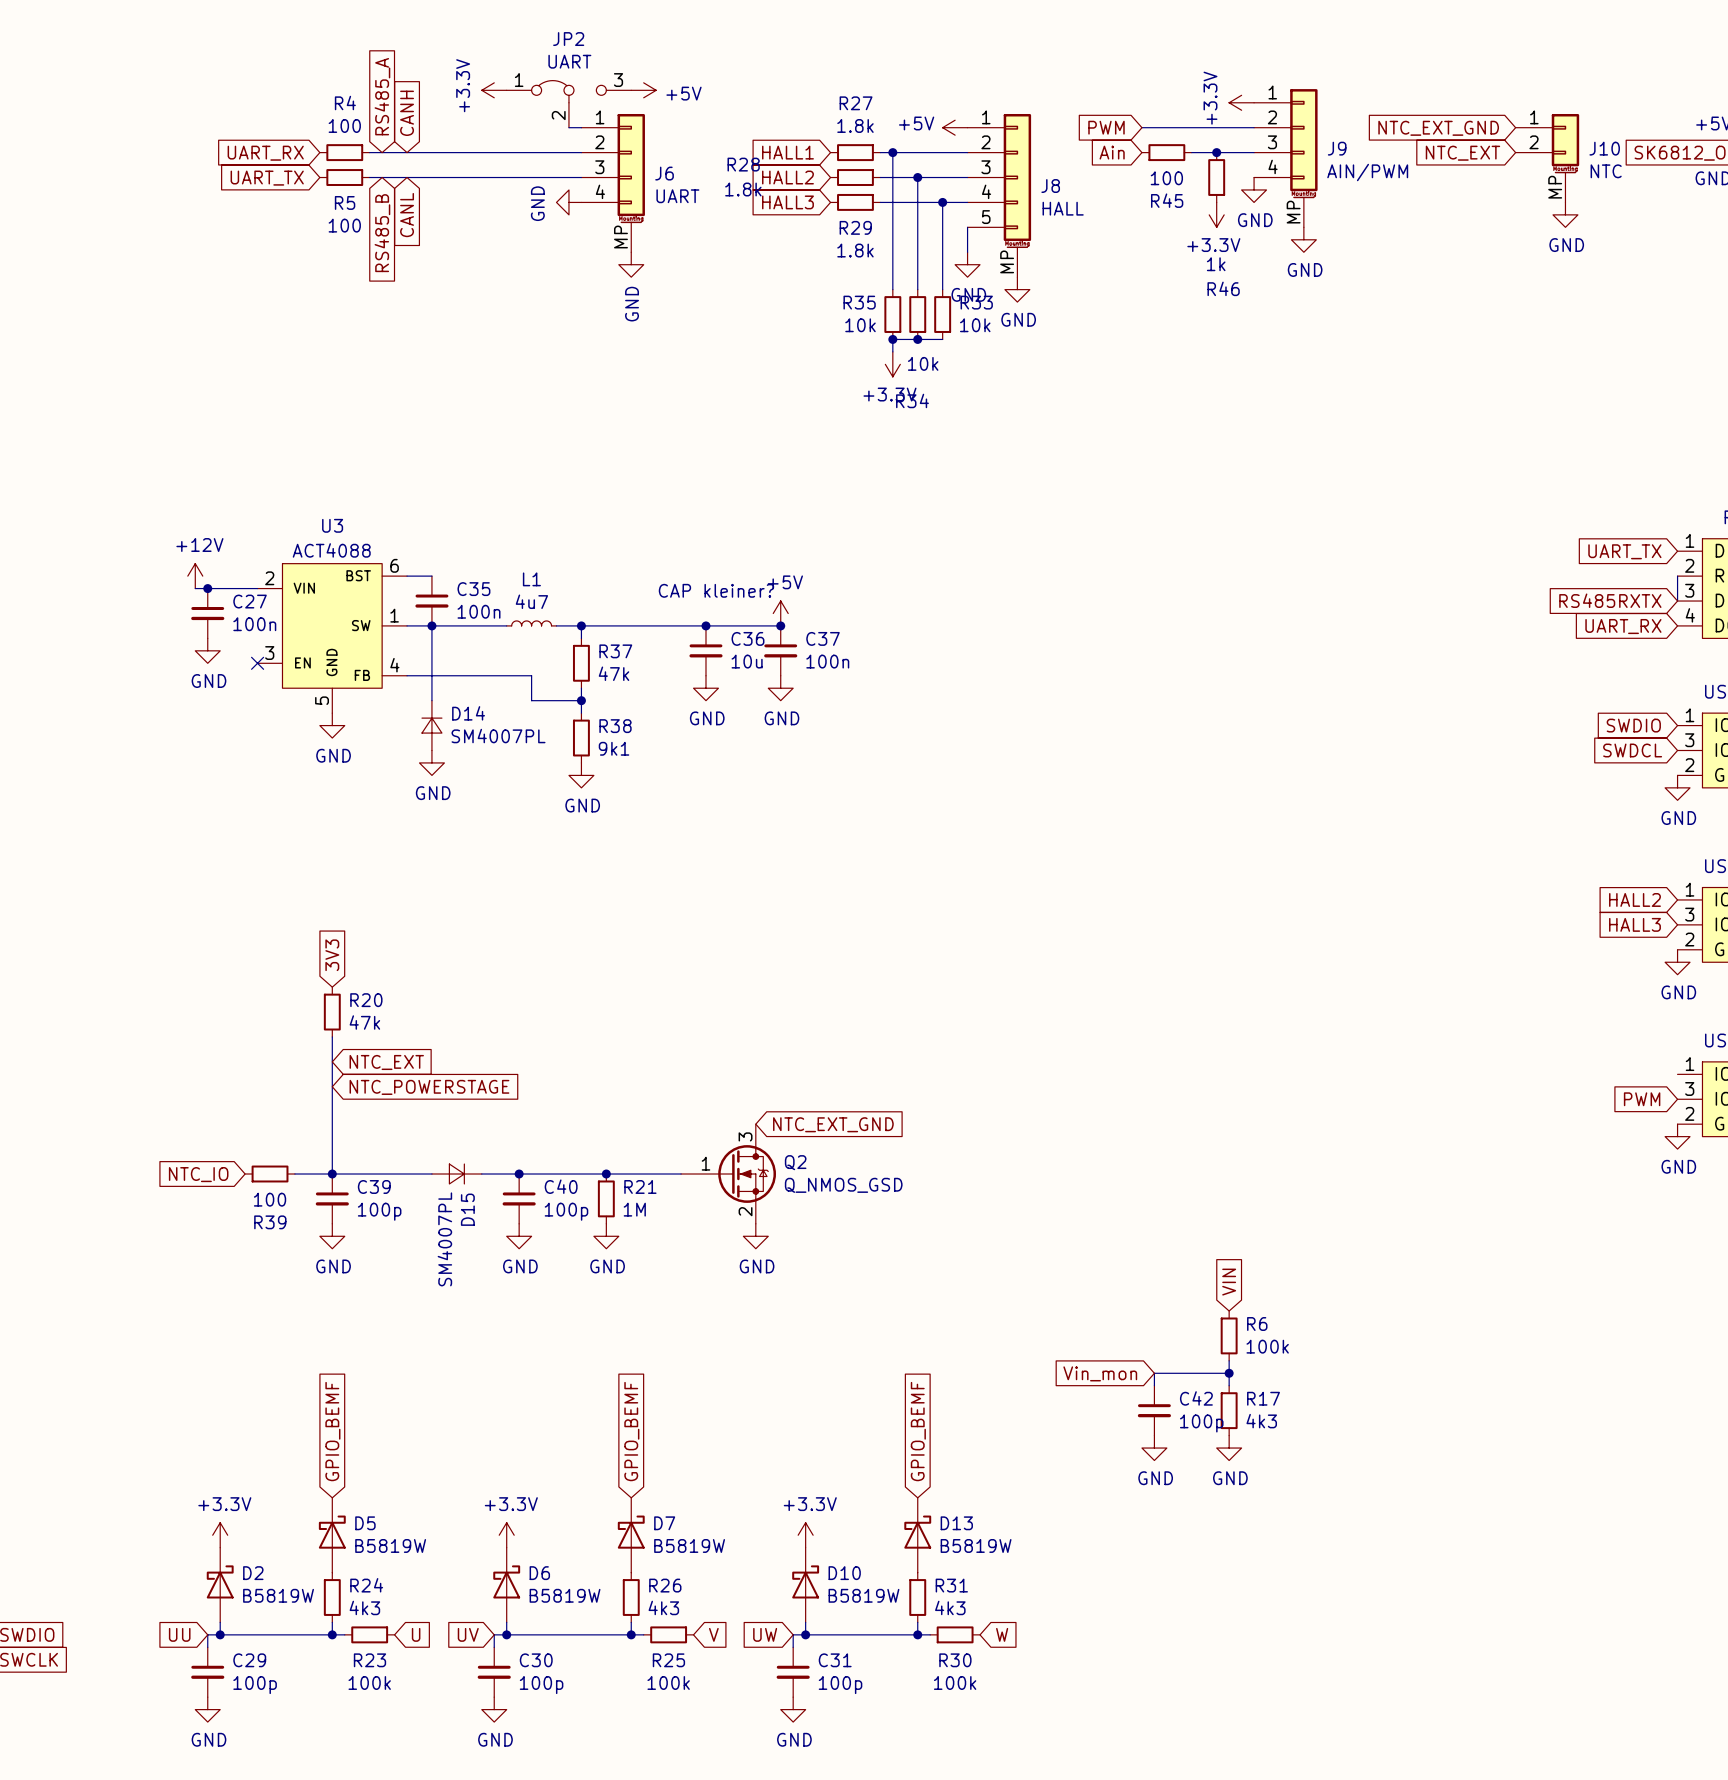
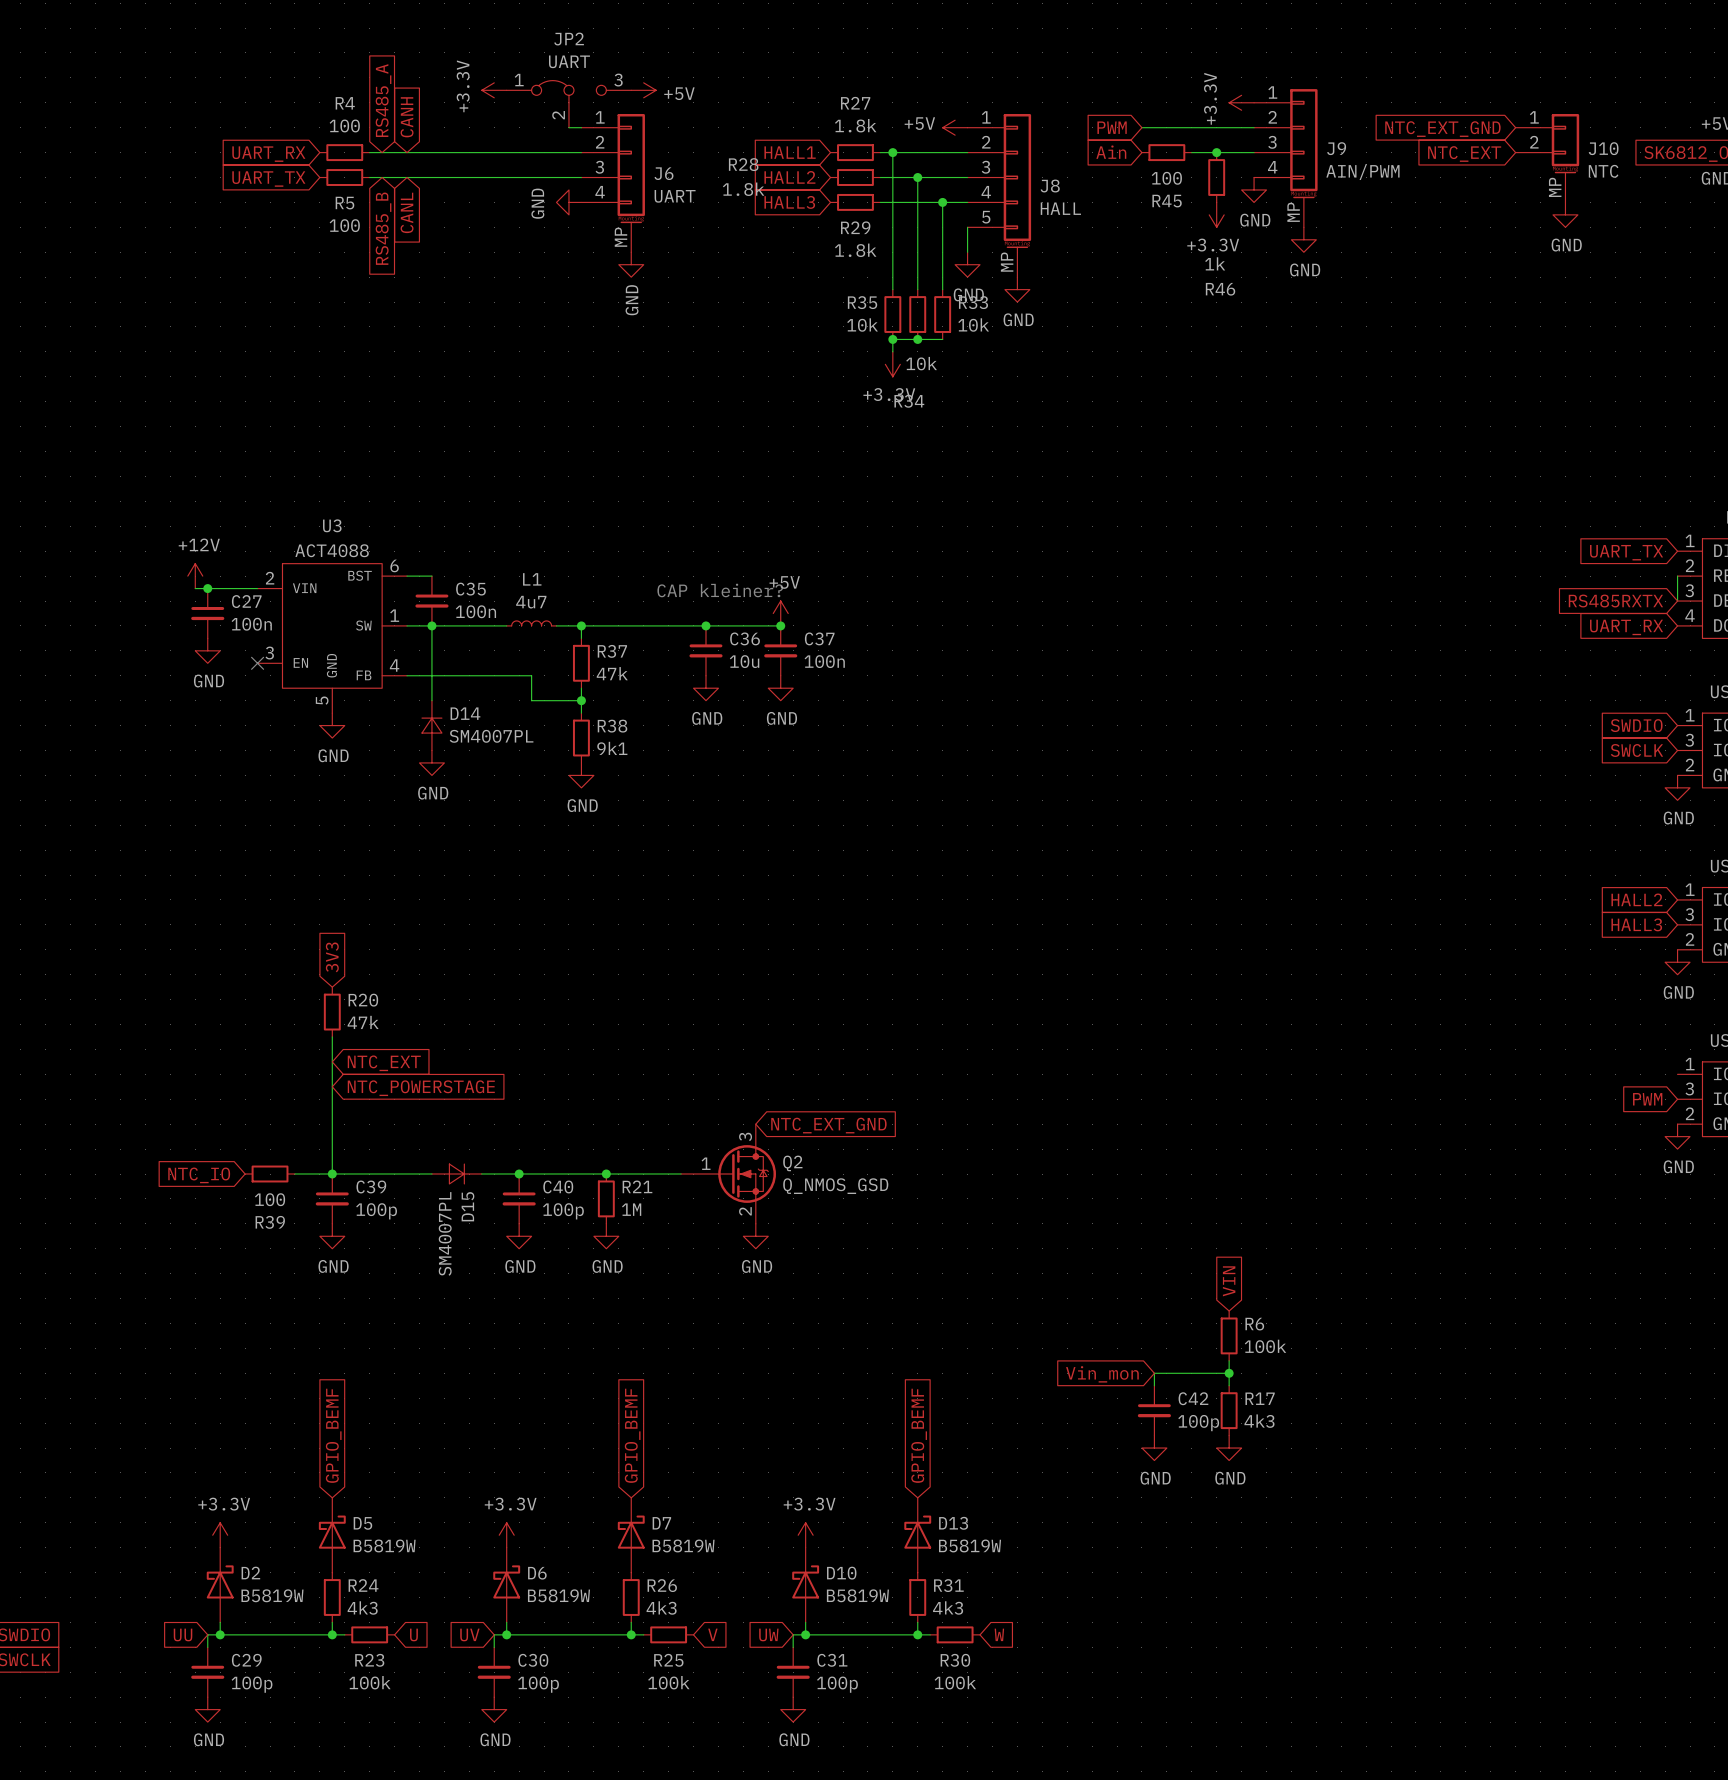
global label: SWDCL (1632, 750) -> SWCLK (1636, 750)

